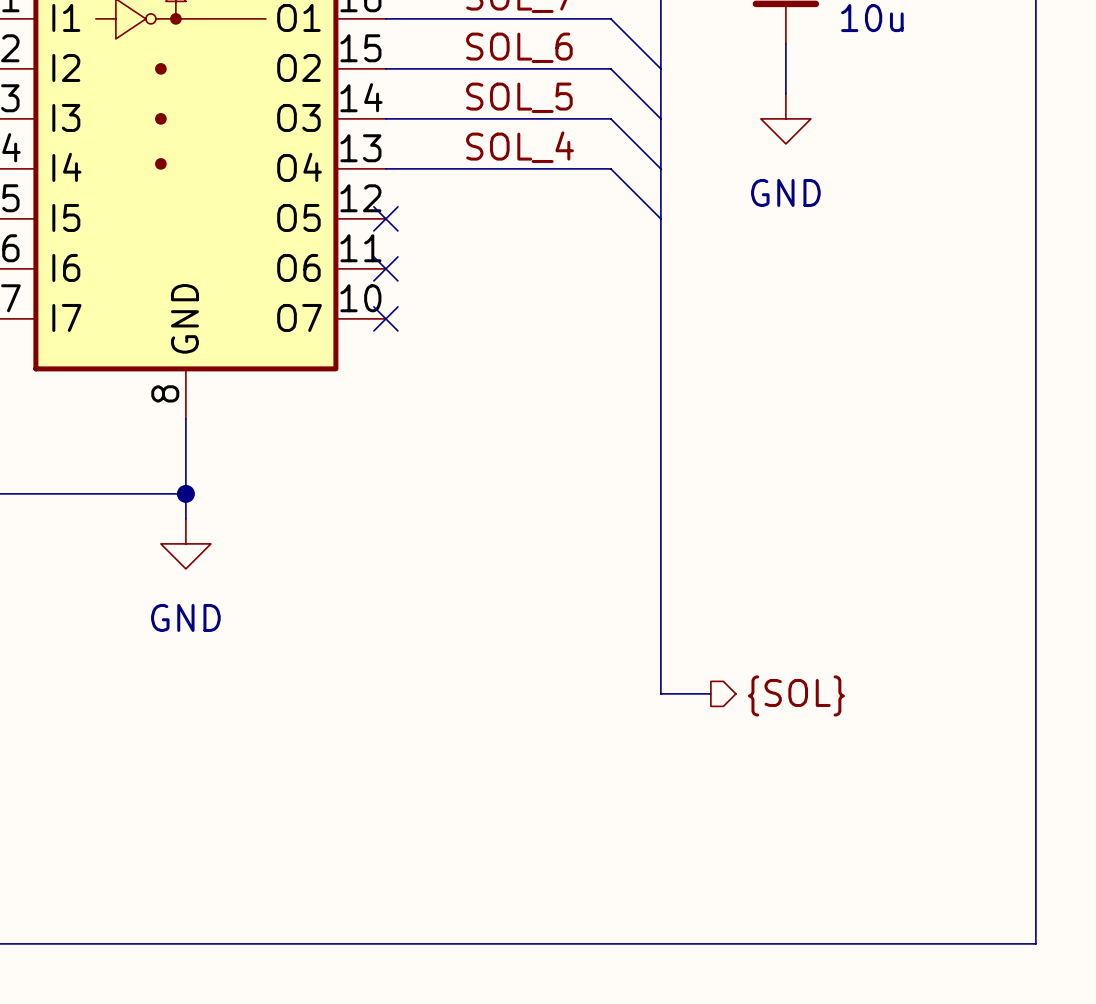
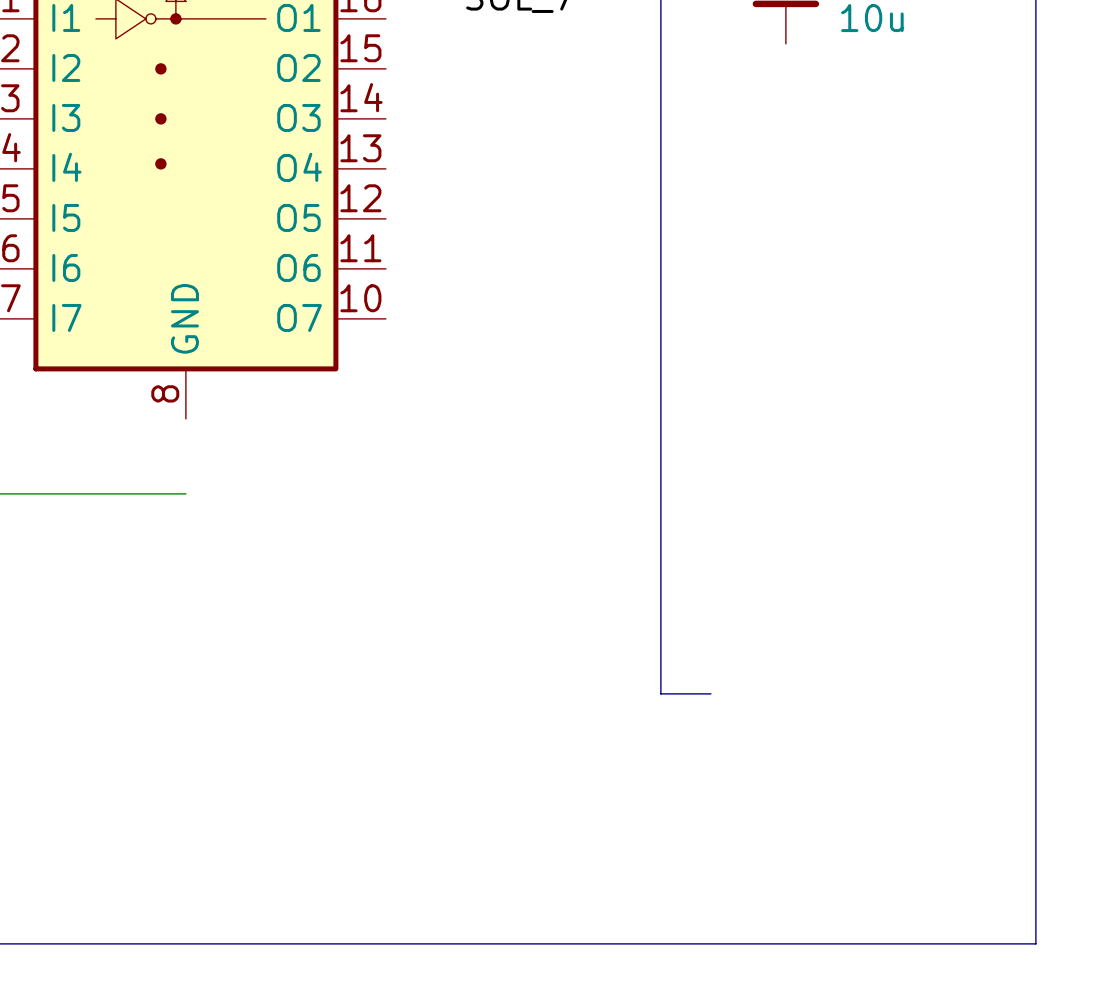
wire: (385, 18) (610, 18) (660, 68) -> none
wire: (785, 43) (785, 93) -> none
label: SOL_6 (519, 47) -> none
wire: (385, 68) (610, 68) (660, 118) -> none
label: SOL_5 (519, 97) -> none
wire: (385, 118) (610, 118) (660, 168) -> none
power symbol: GND (785, 118) -> none
label: SOL_4 (520, 147) -> none
wire: (385, 168) (610, 168) (660, 218) -> none
no-connect mark: (385, 218) -> none
no-connect mark: (385, 268) -> none
no-connect mark: (385, 318) -> none
wire: (185, 418) (185, 518) -> none
junction: (185, 493) -> none
power symbol: GND (185, 543) -> none
hierarchical label: {SOL} (796, 695) -> none

